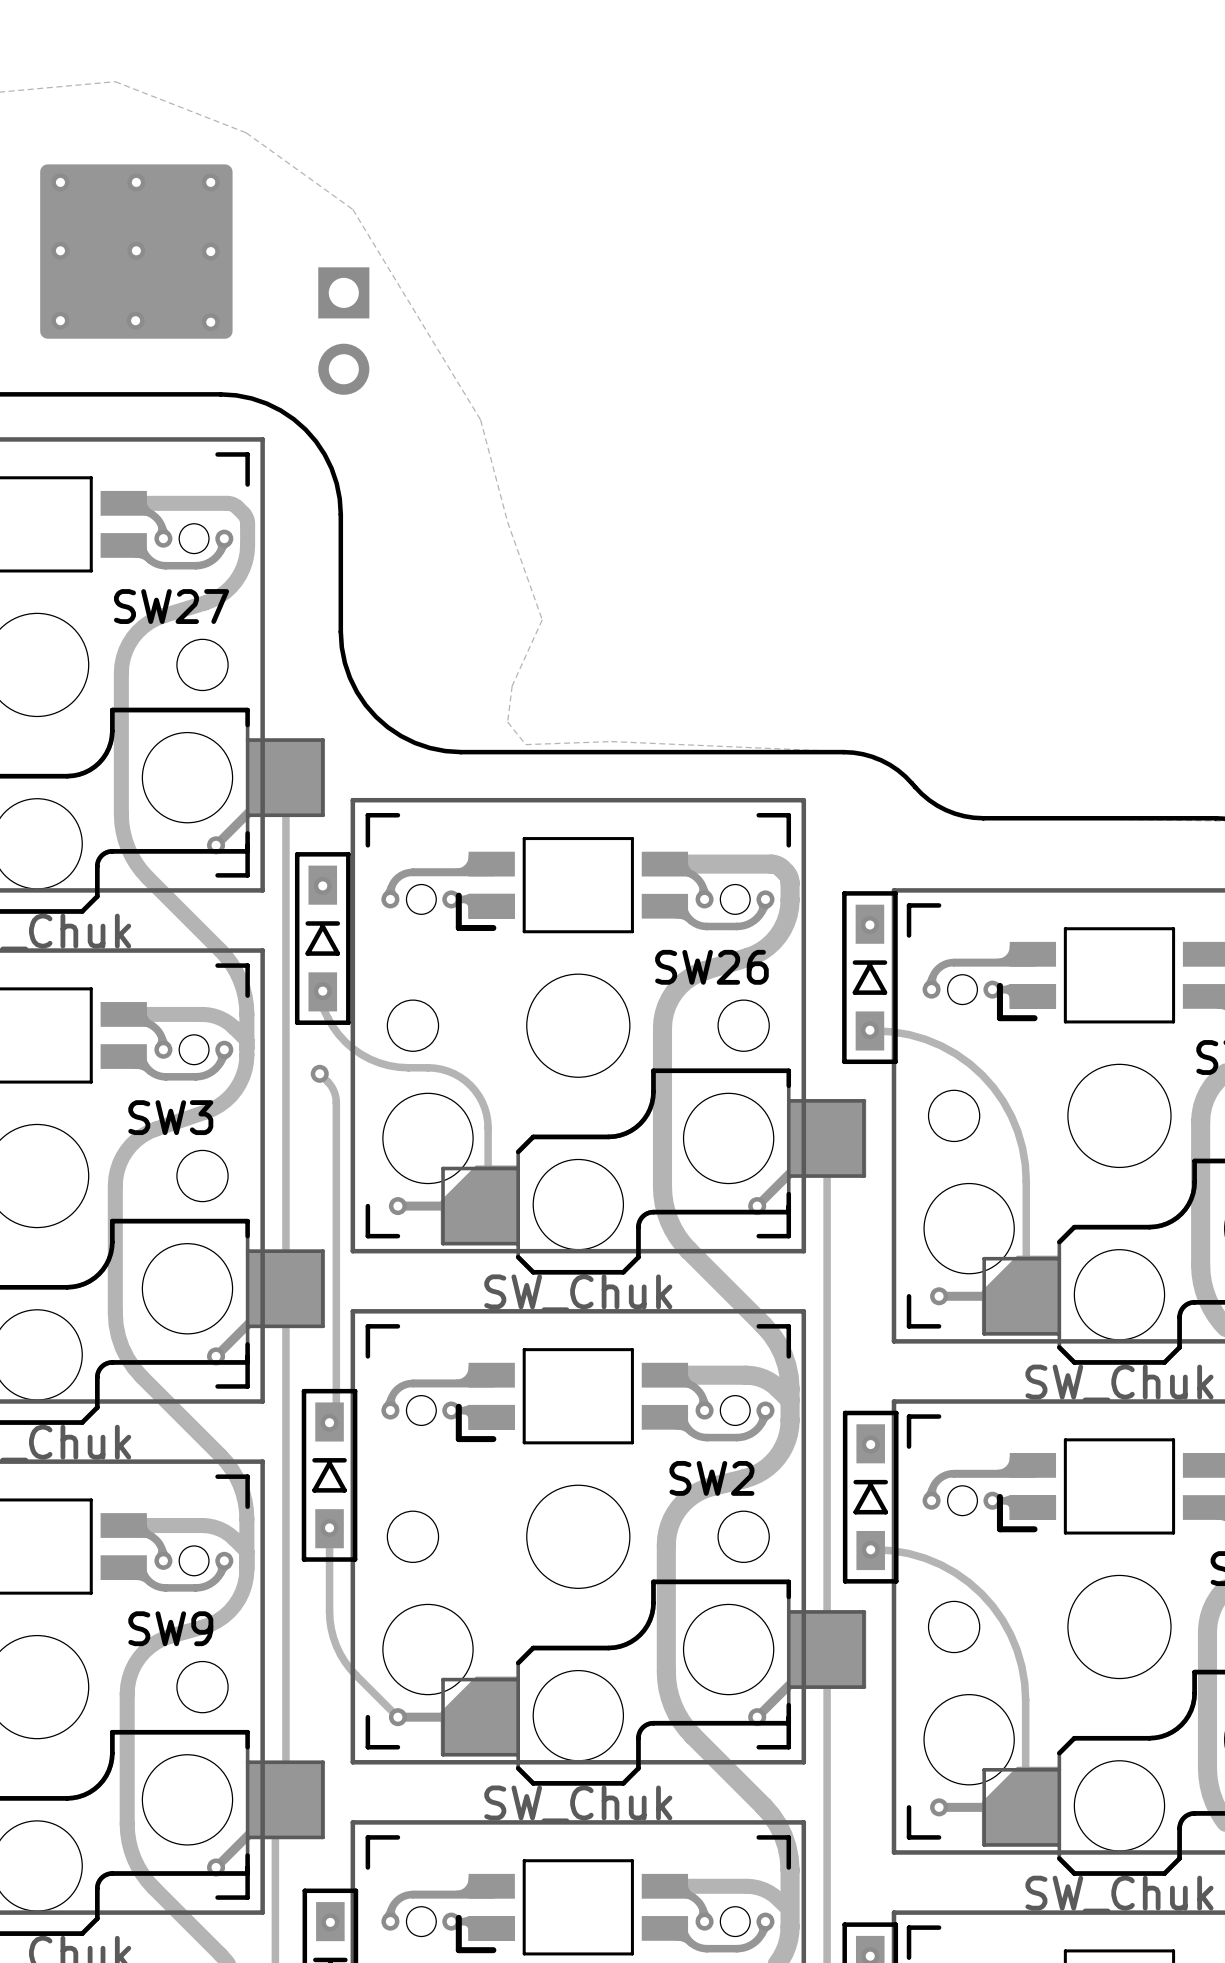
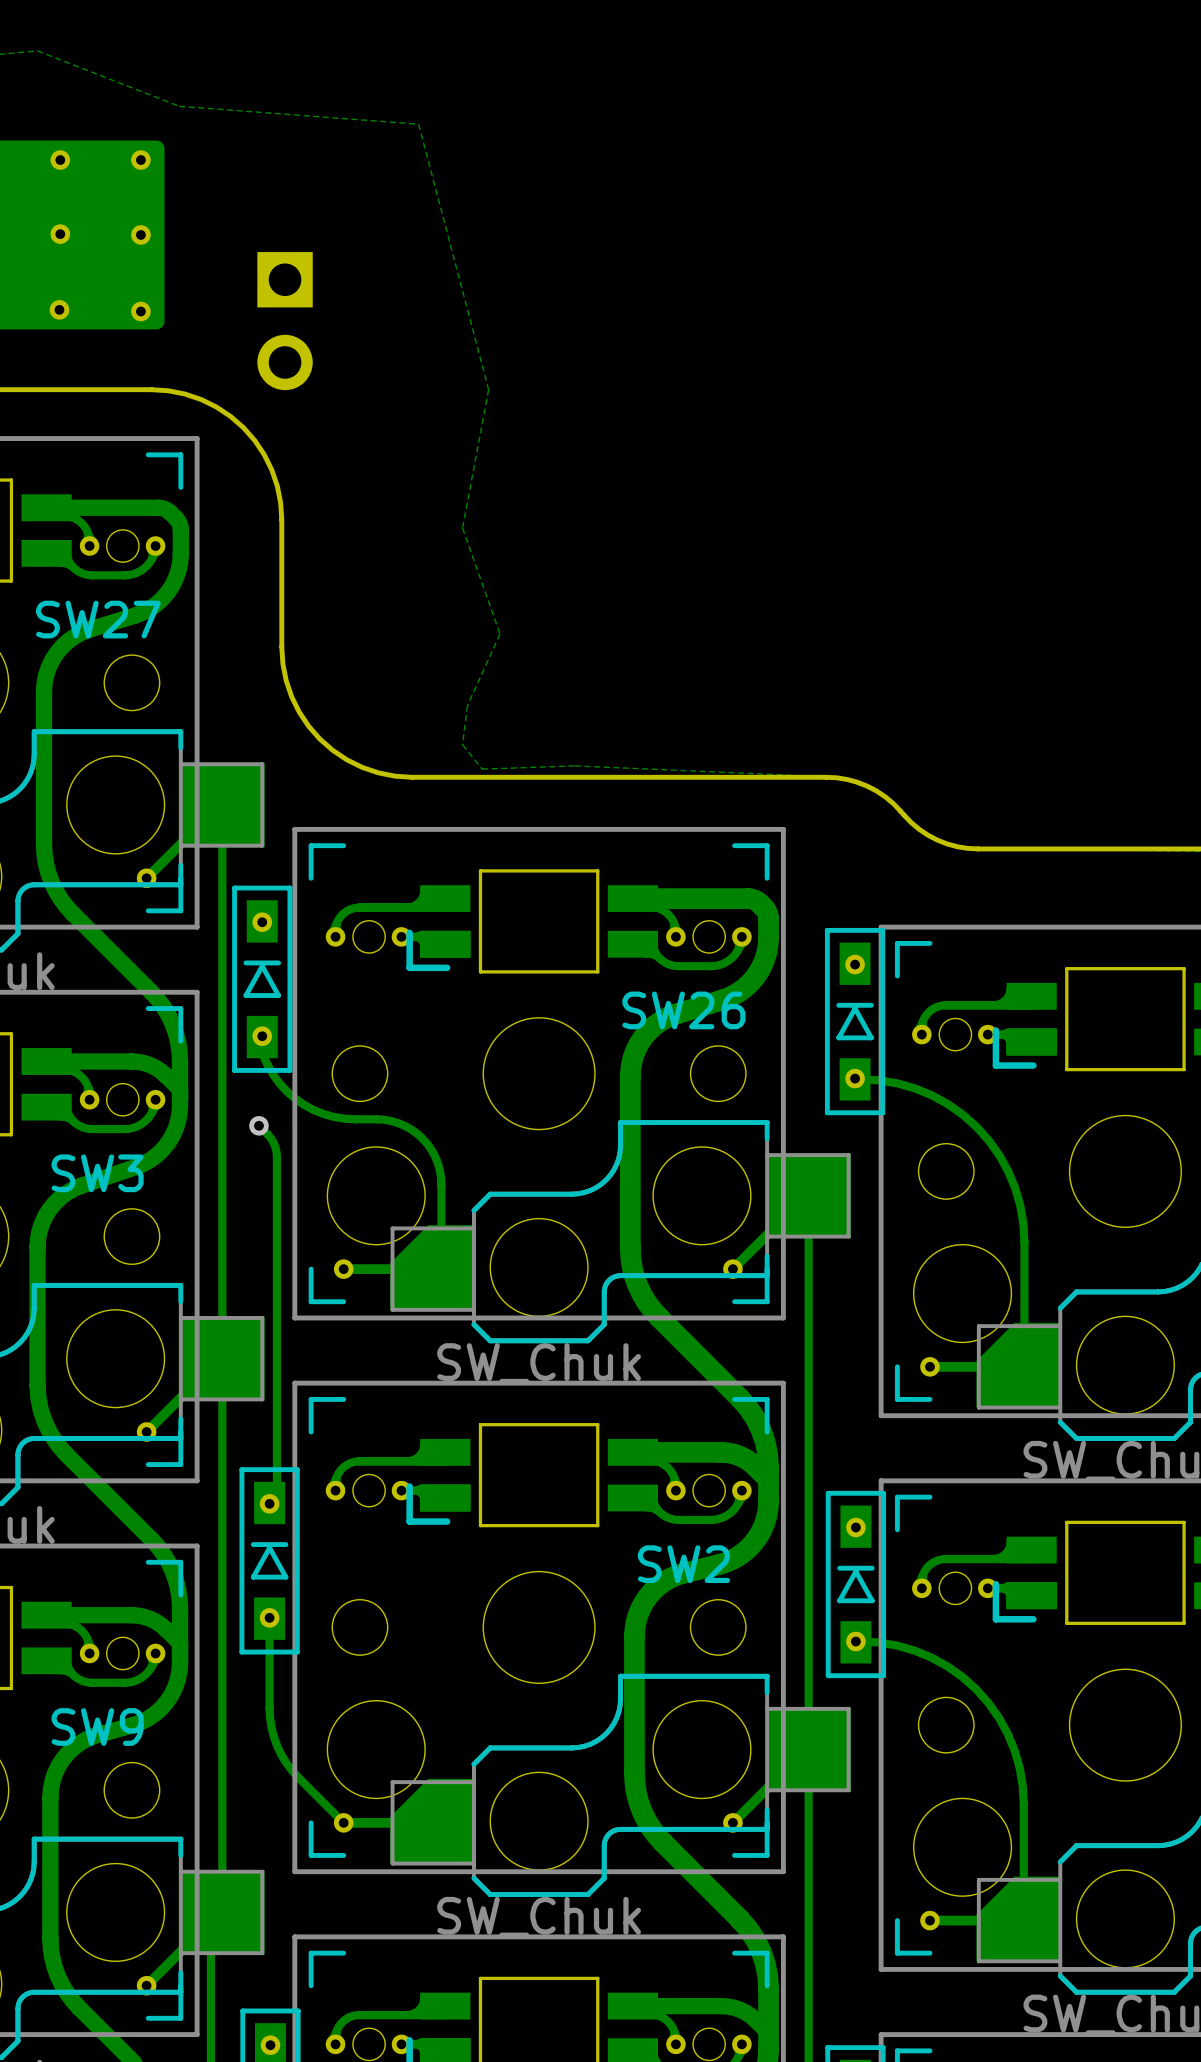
zone outline: (246, 132) (352, 209) (480, 419) (507, 522) -> (179, 106) (418, 124) (488, 389) (462, 528)

